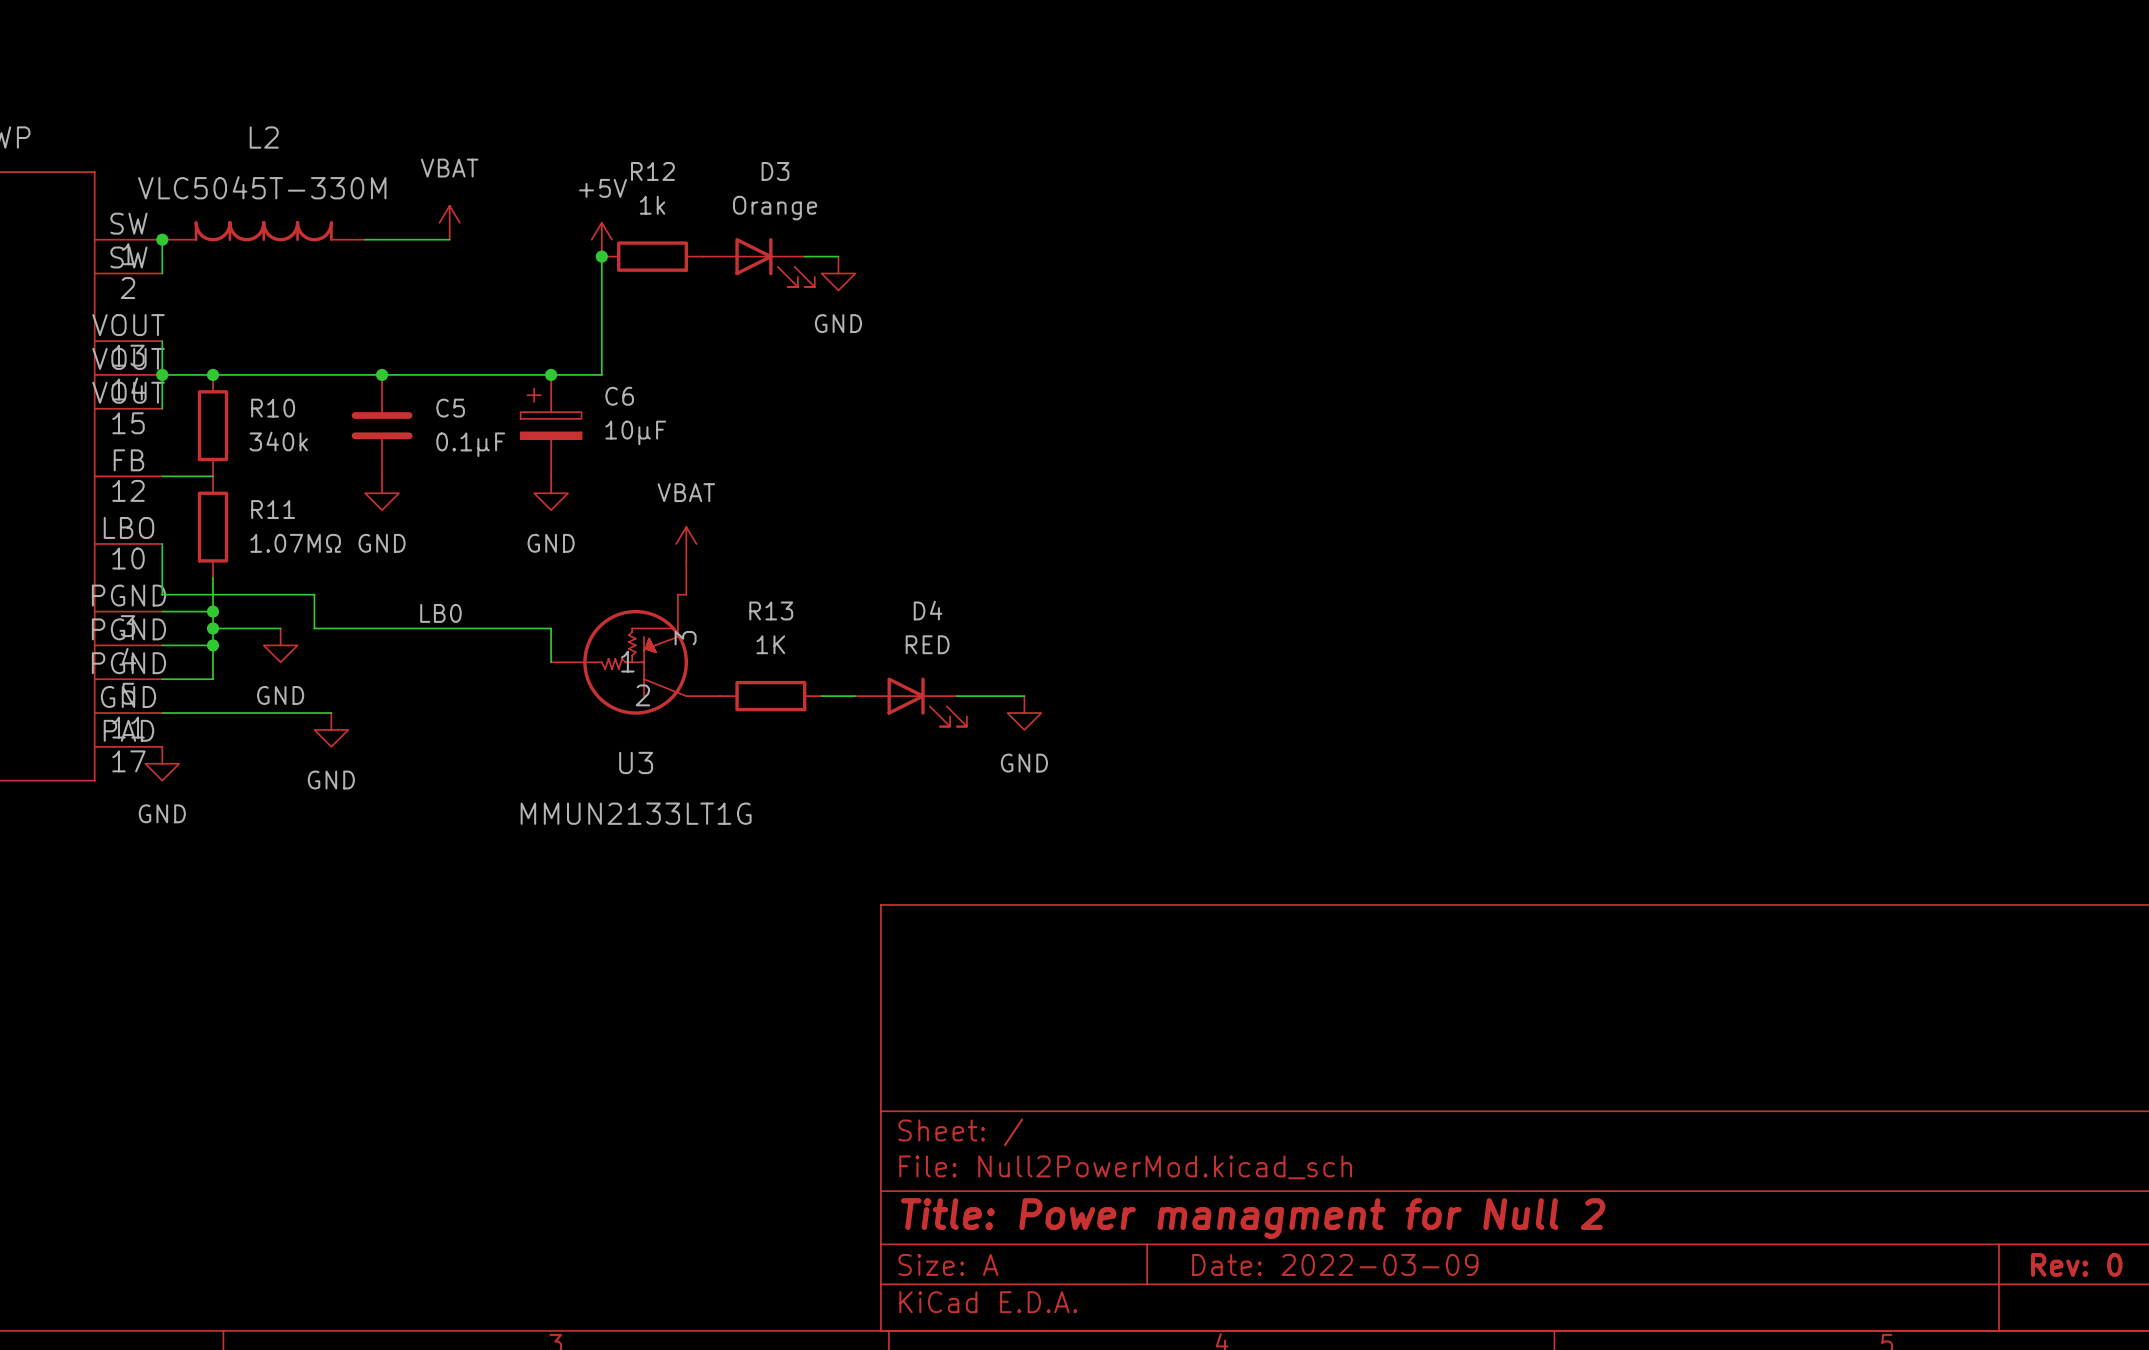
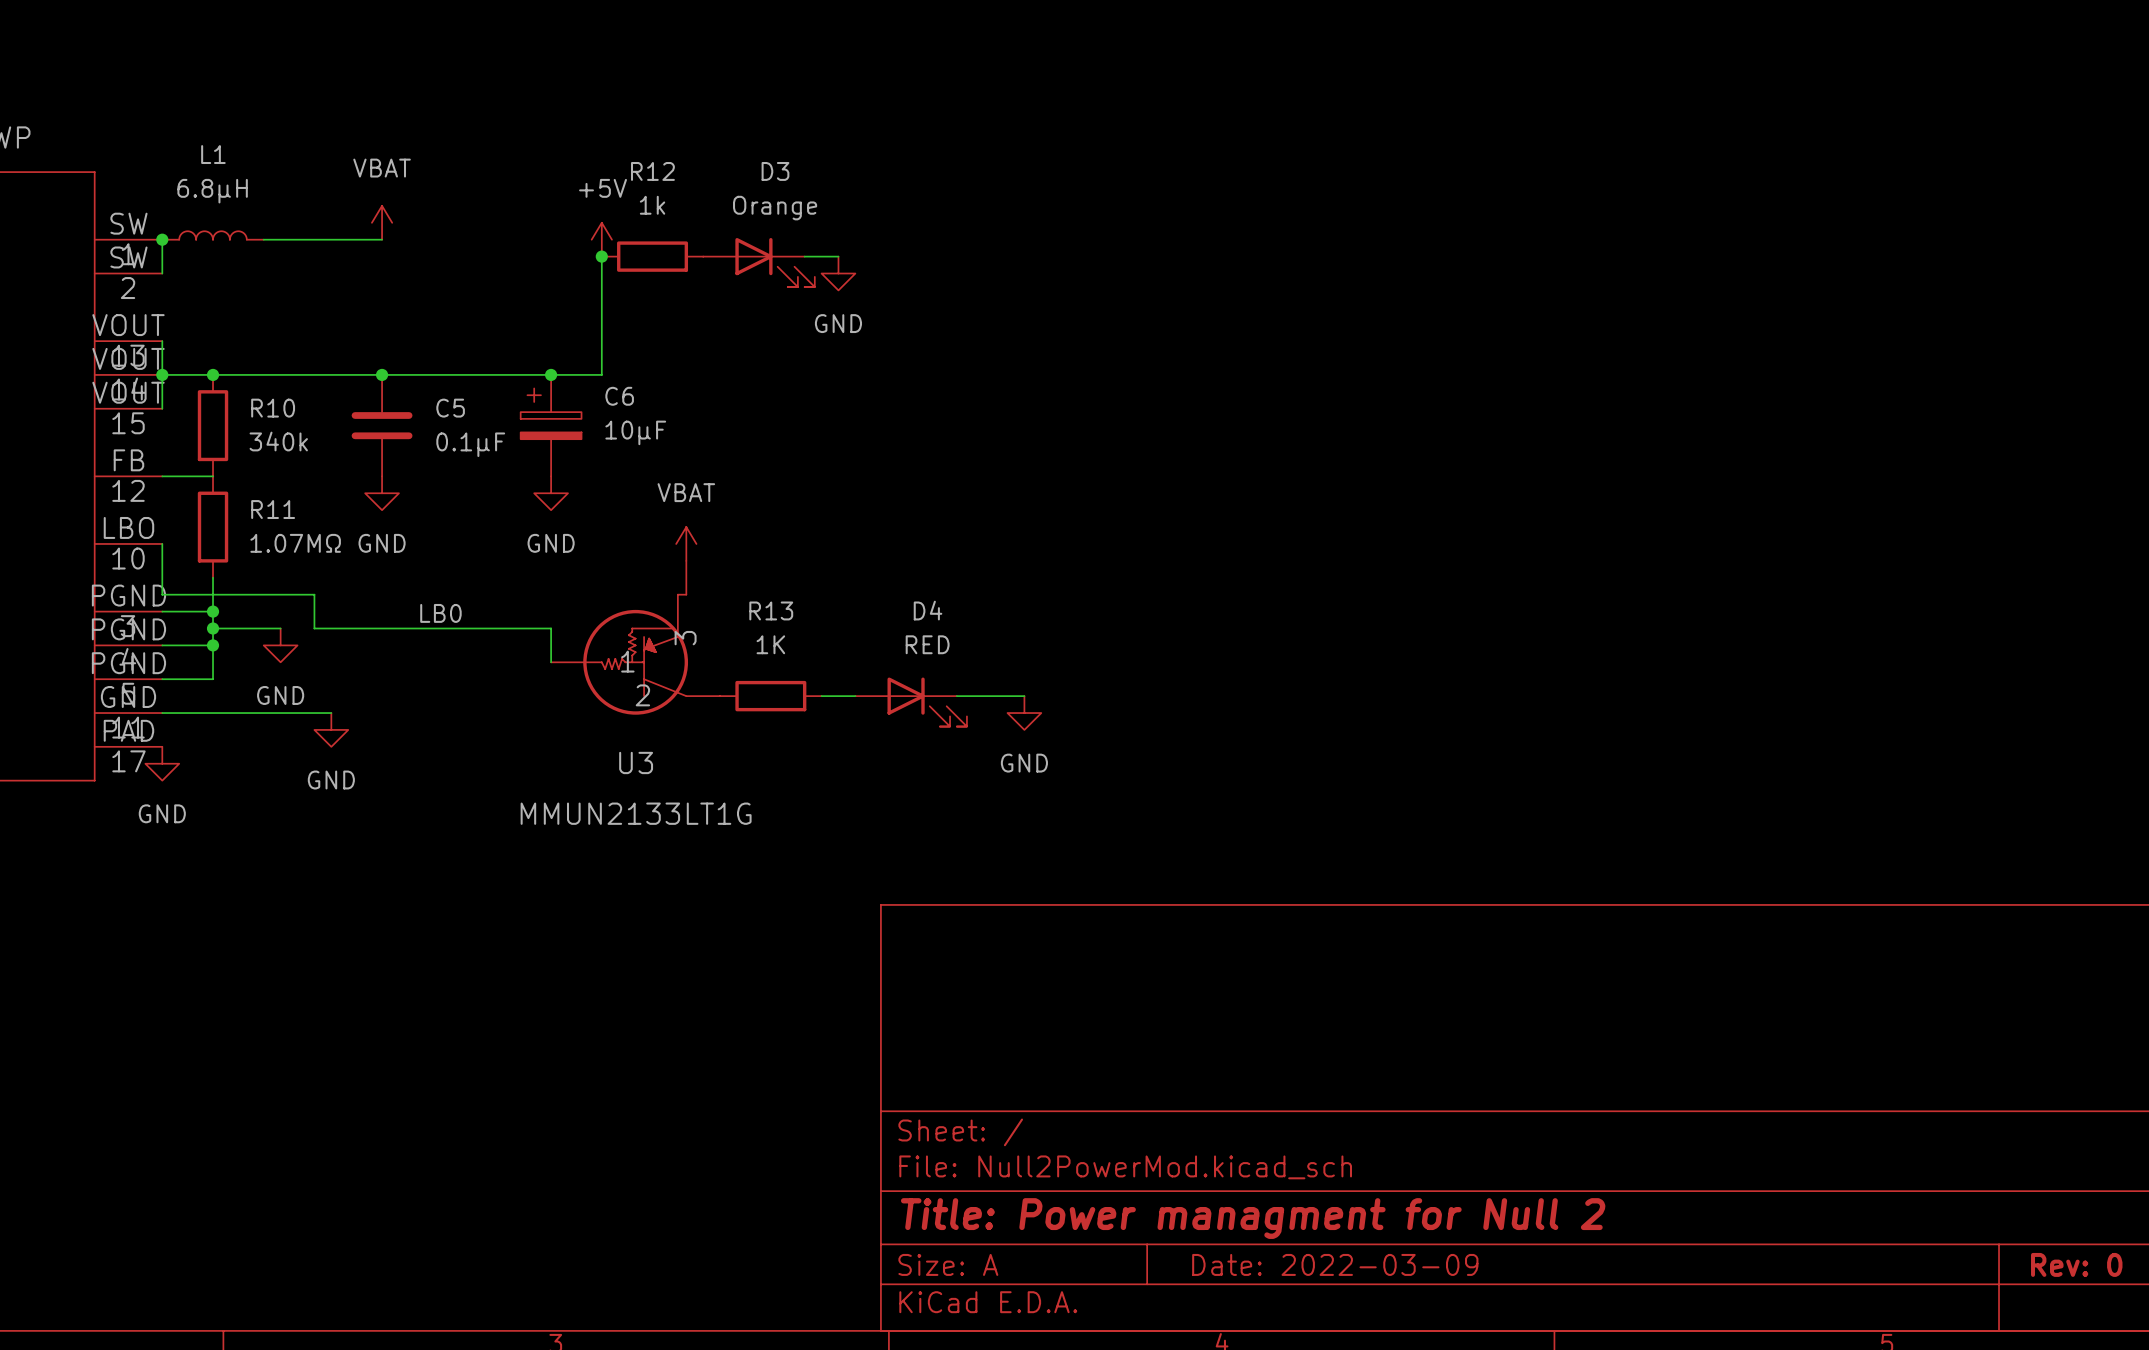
power symbol position: VBAT (449, 222) -> VBAT (382, 222)
L2: VLC5045T-330M (263, 231) -> none
L1: none -> 6.8μH (213, 235)
wire: (382, 239) (449, 239) -> none

